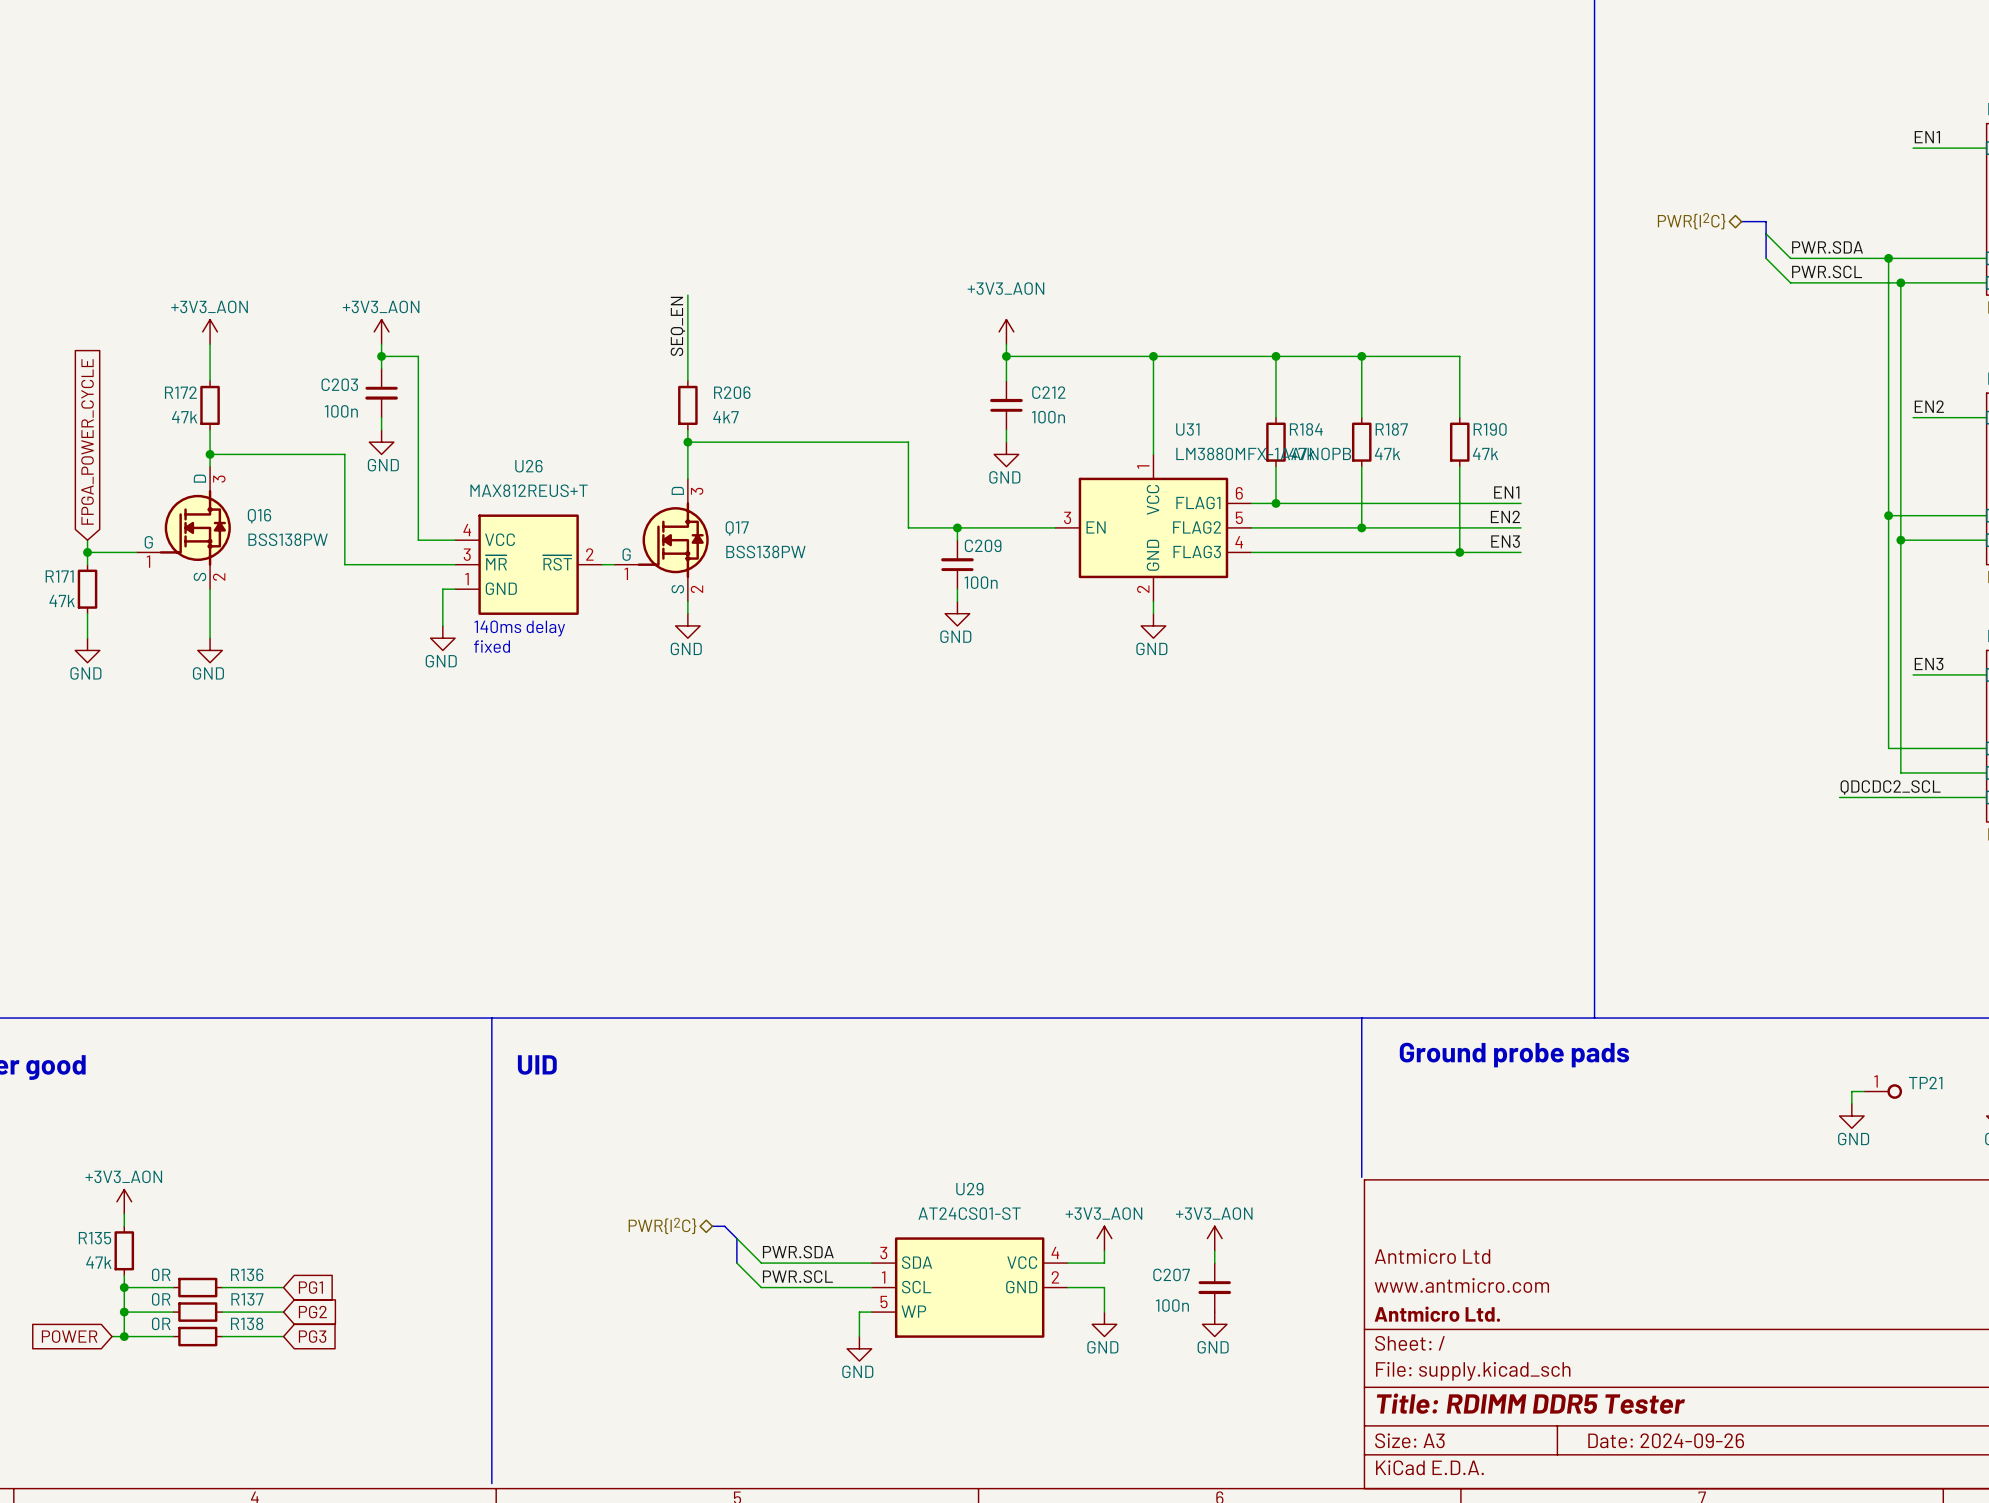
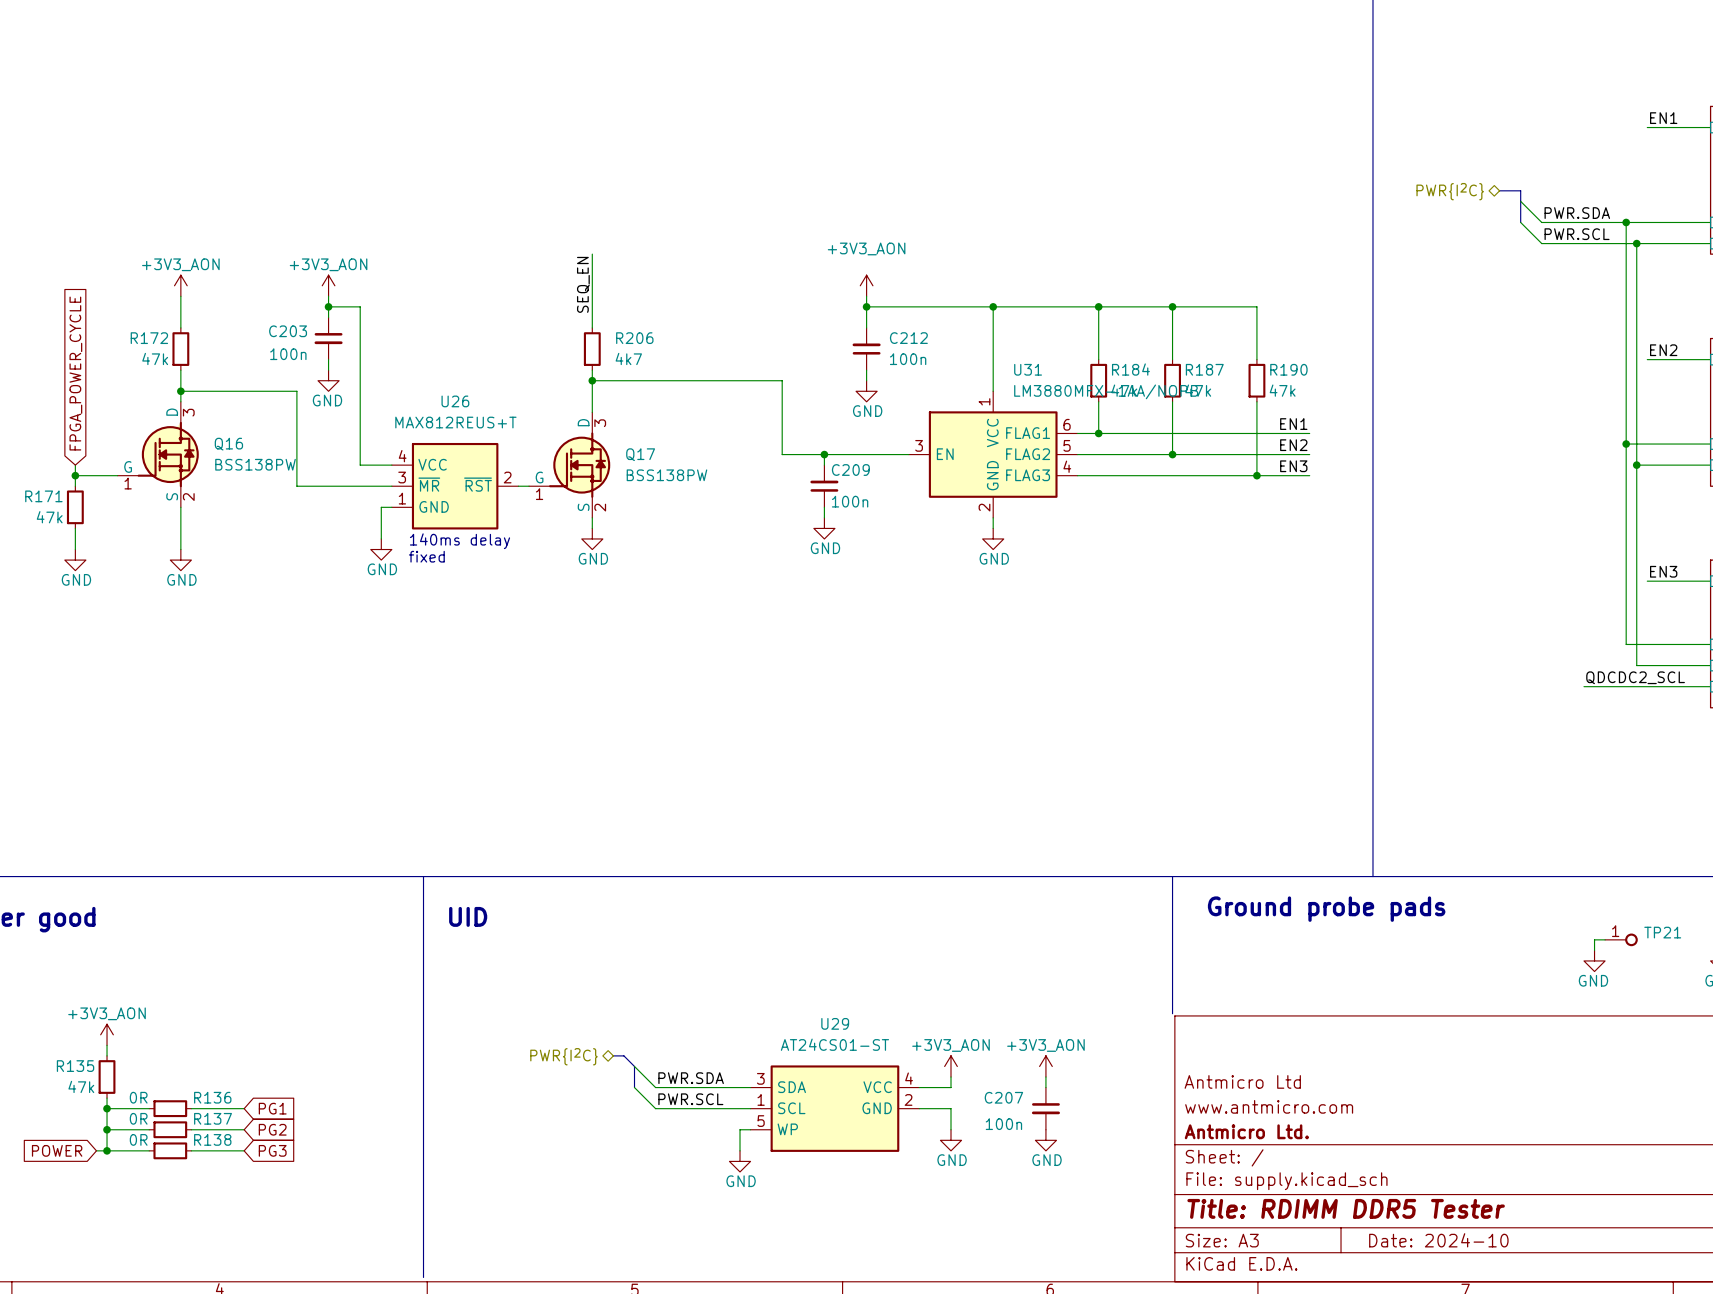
title block: Date: 2024-09-26 (1666, 1440) -> Date: 2024-10 (1438, 1240)

